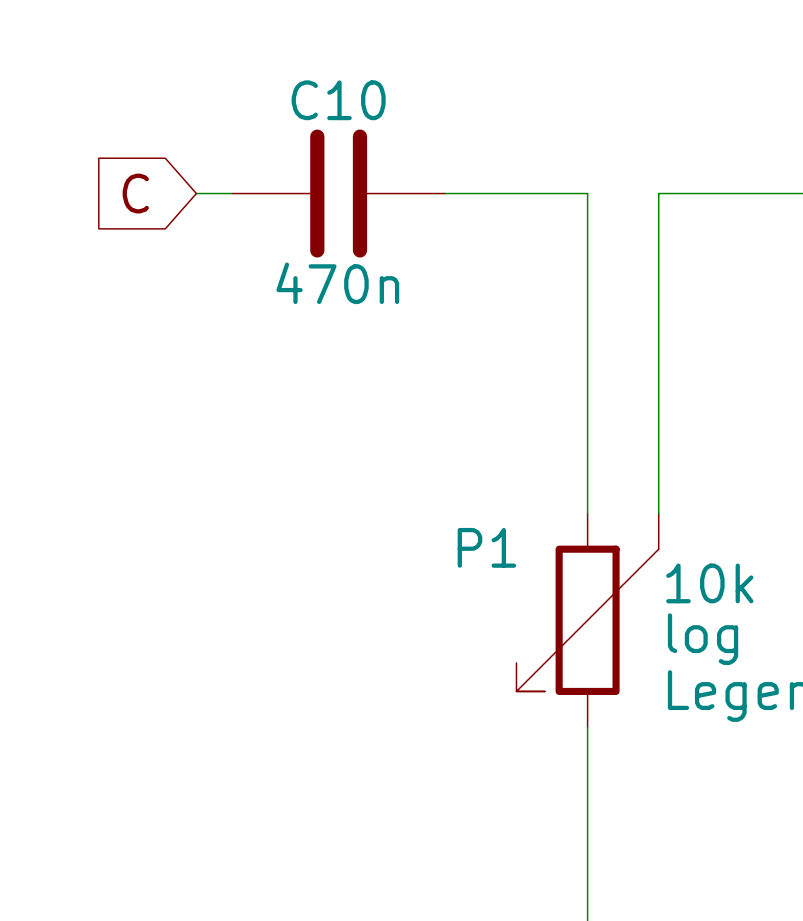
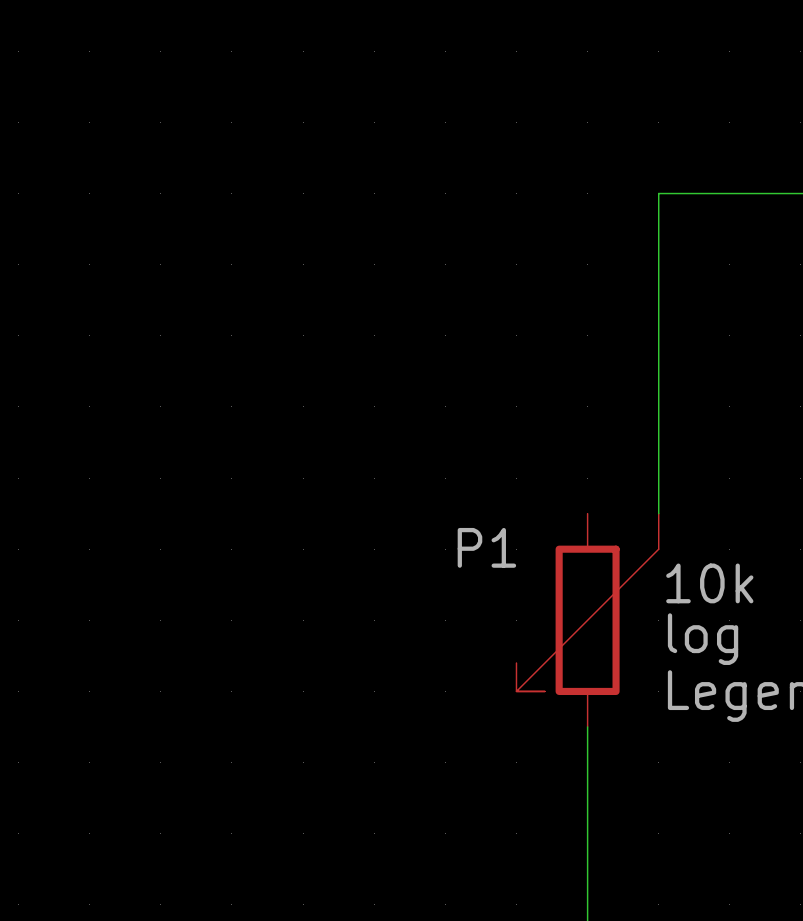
global label: C (135, 193) -> none
wire: (196, 193) (231, 193) -> none
C10: 470n (338, 193) -> none
wire: (445, 193) (587, 193) (587, 513) -> none

